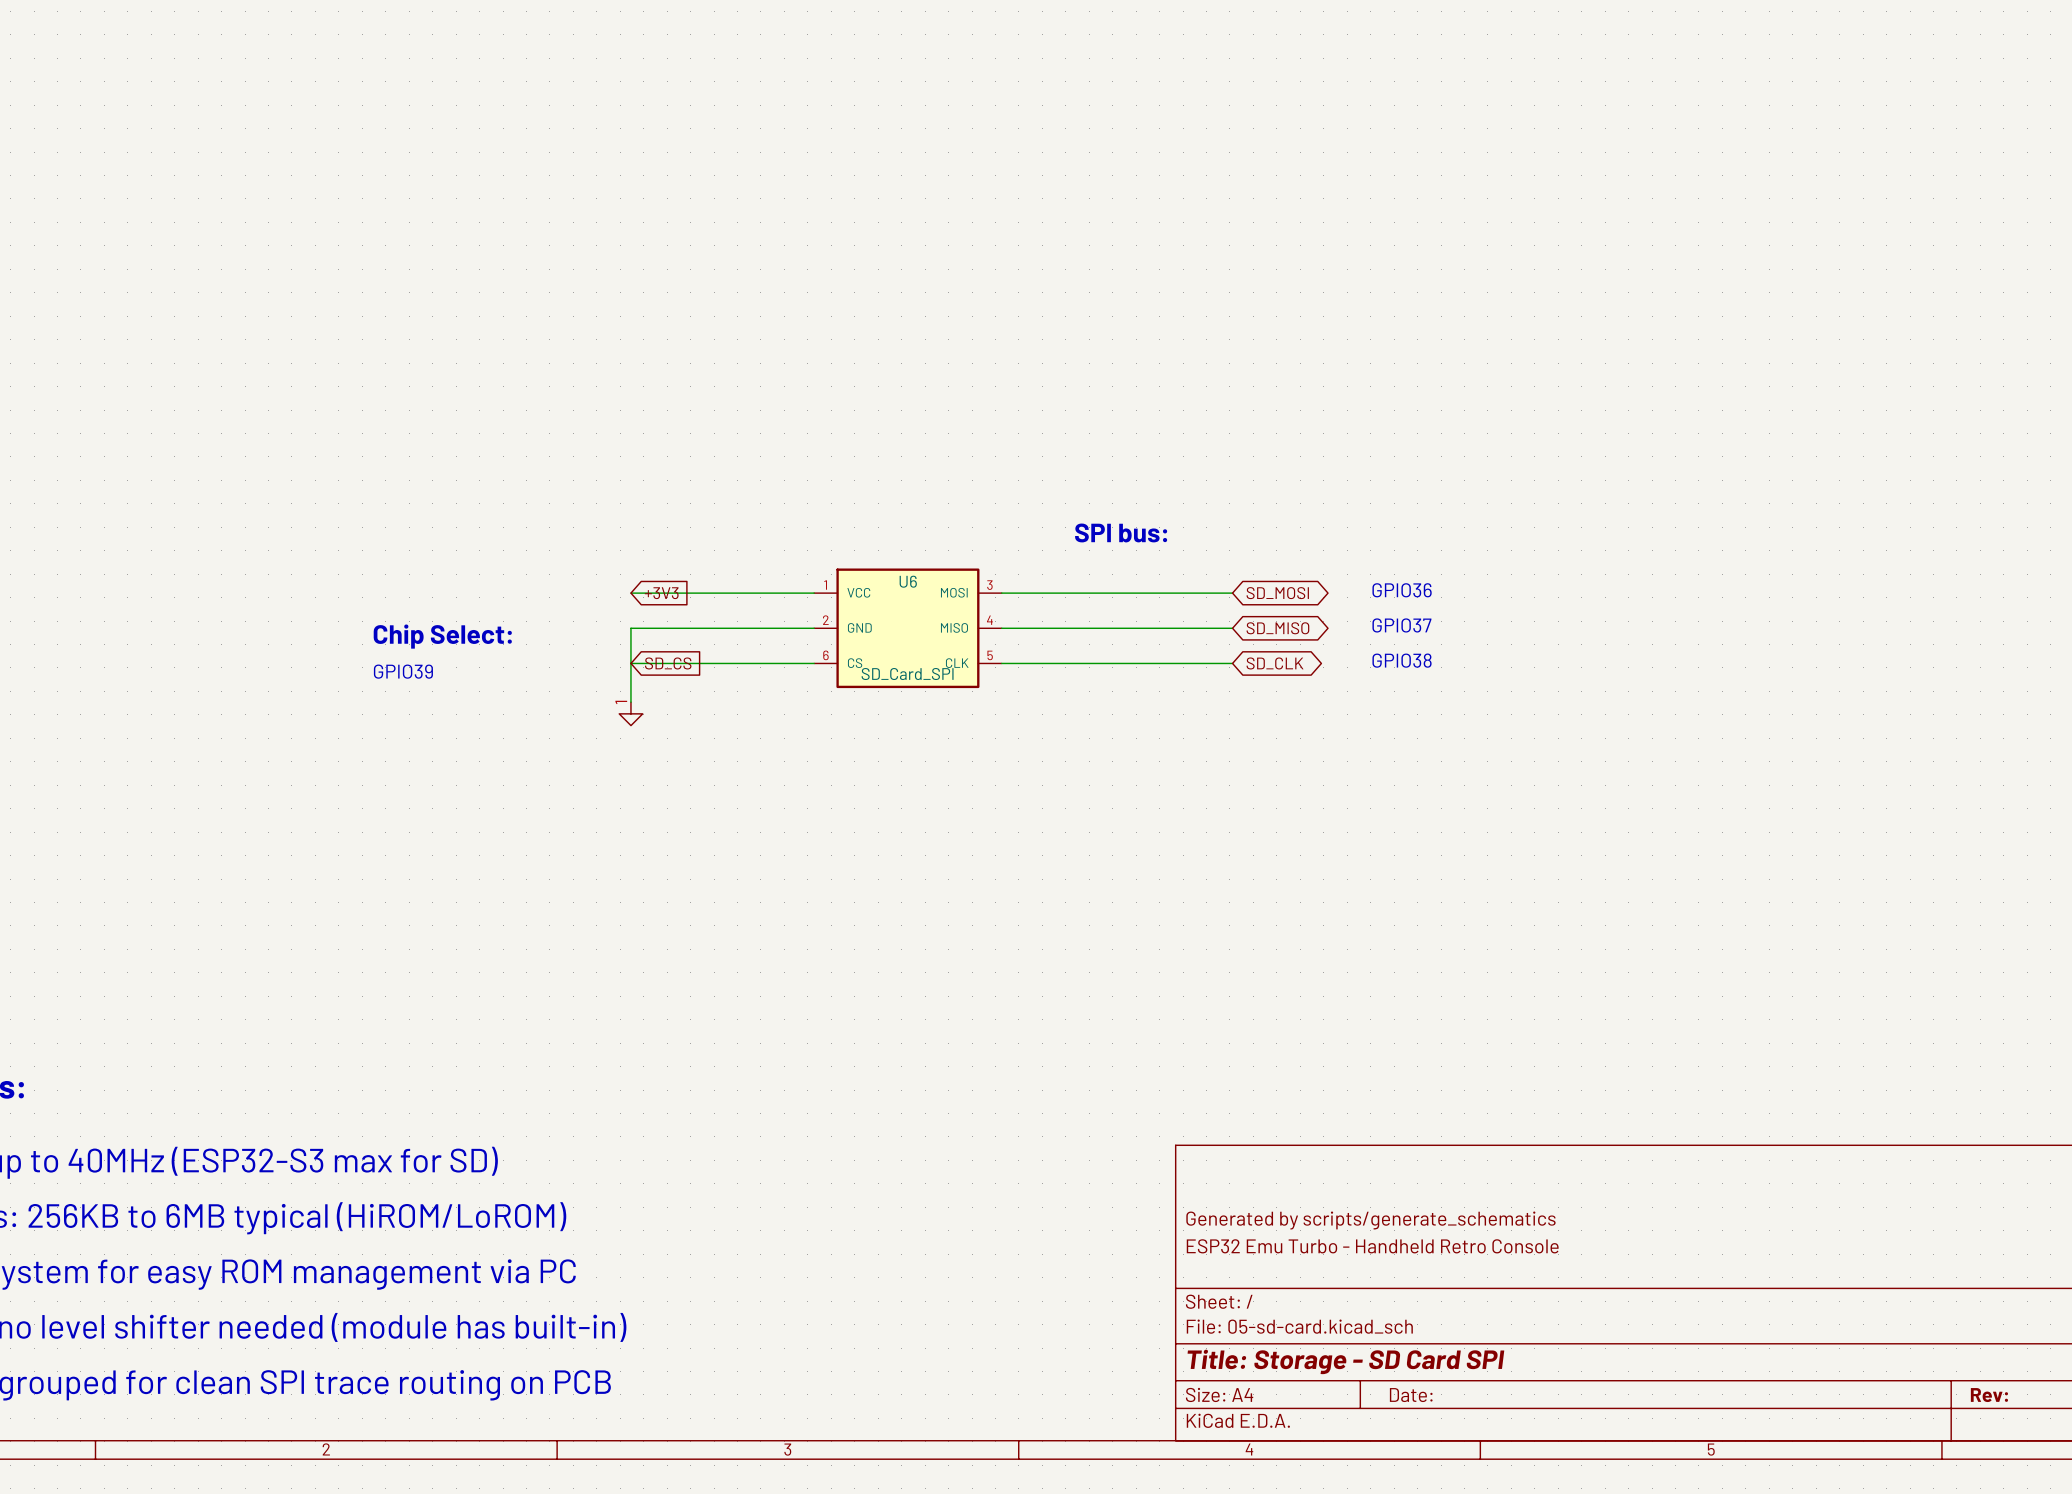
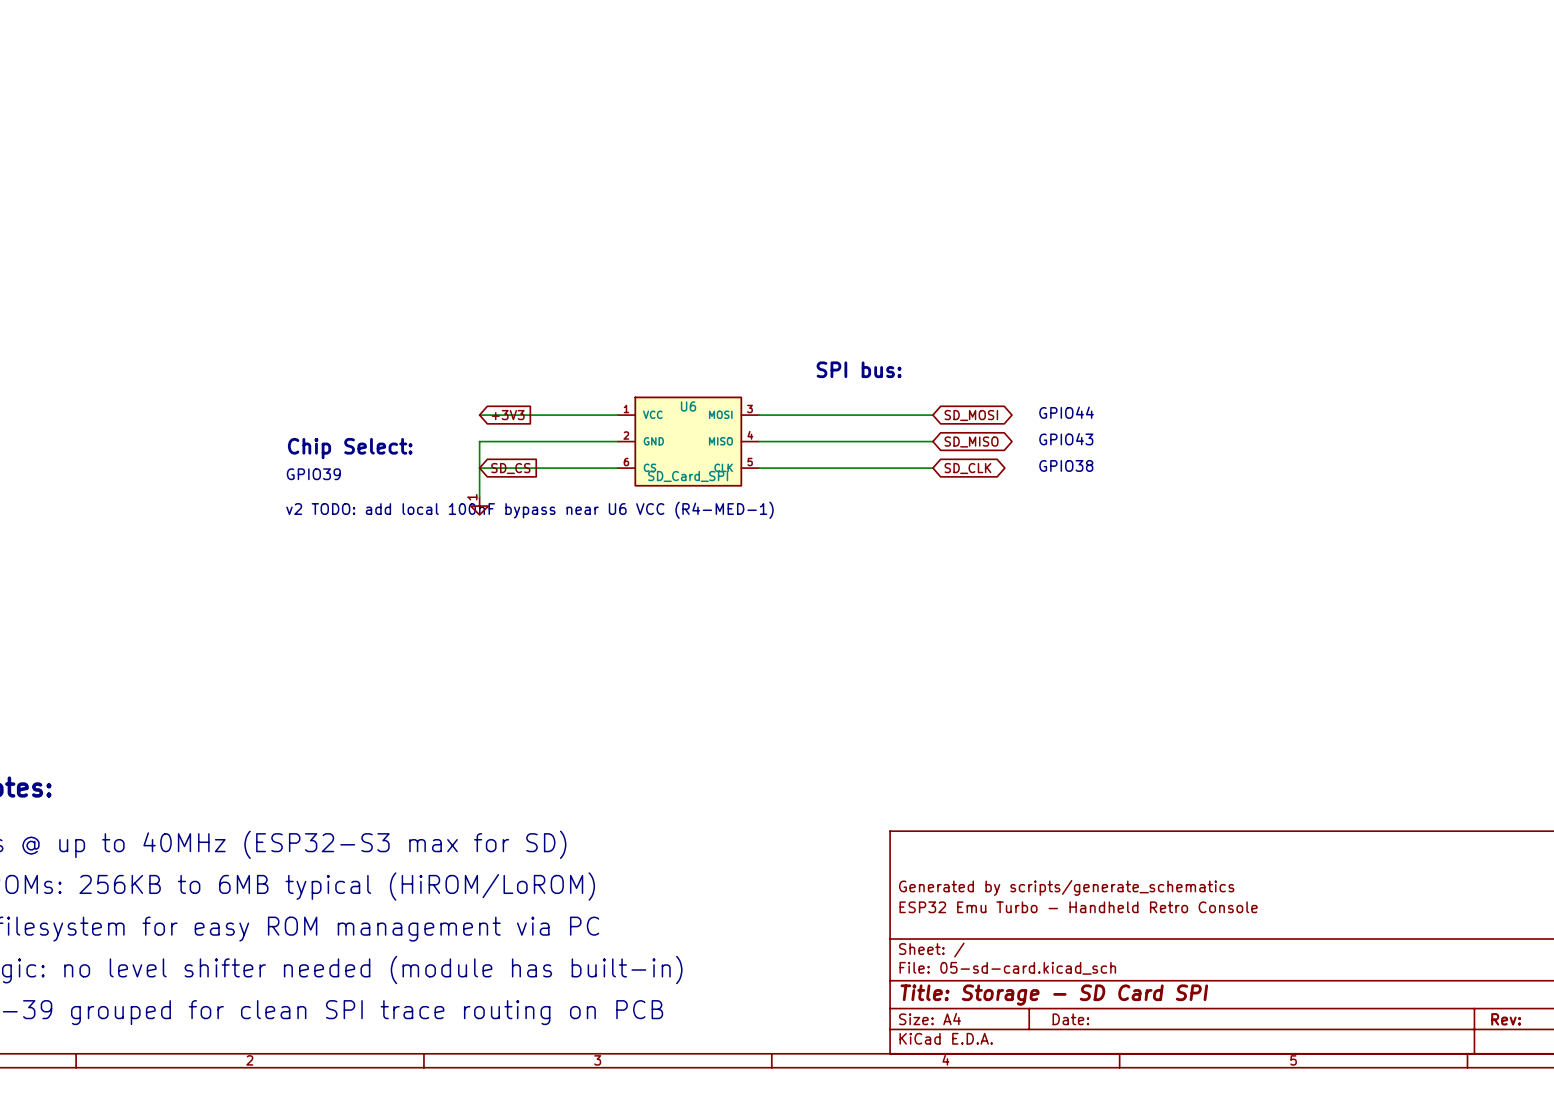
text: GPIO36 (1402, 590) -> GPIO44 (1066, 412)
text: GPIO37 (1401, 625) -> GPIO43 (1066, 439)
text: none -> v2 TODO: add local 100nF bypass near U6 VCC (R4-MED-1) (530, 510)

